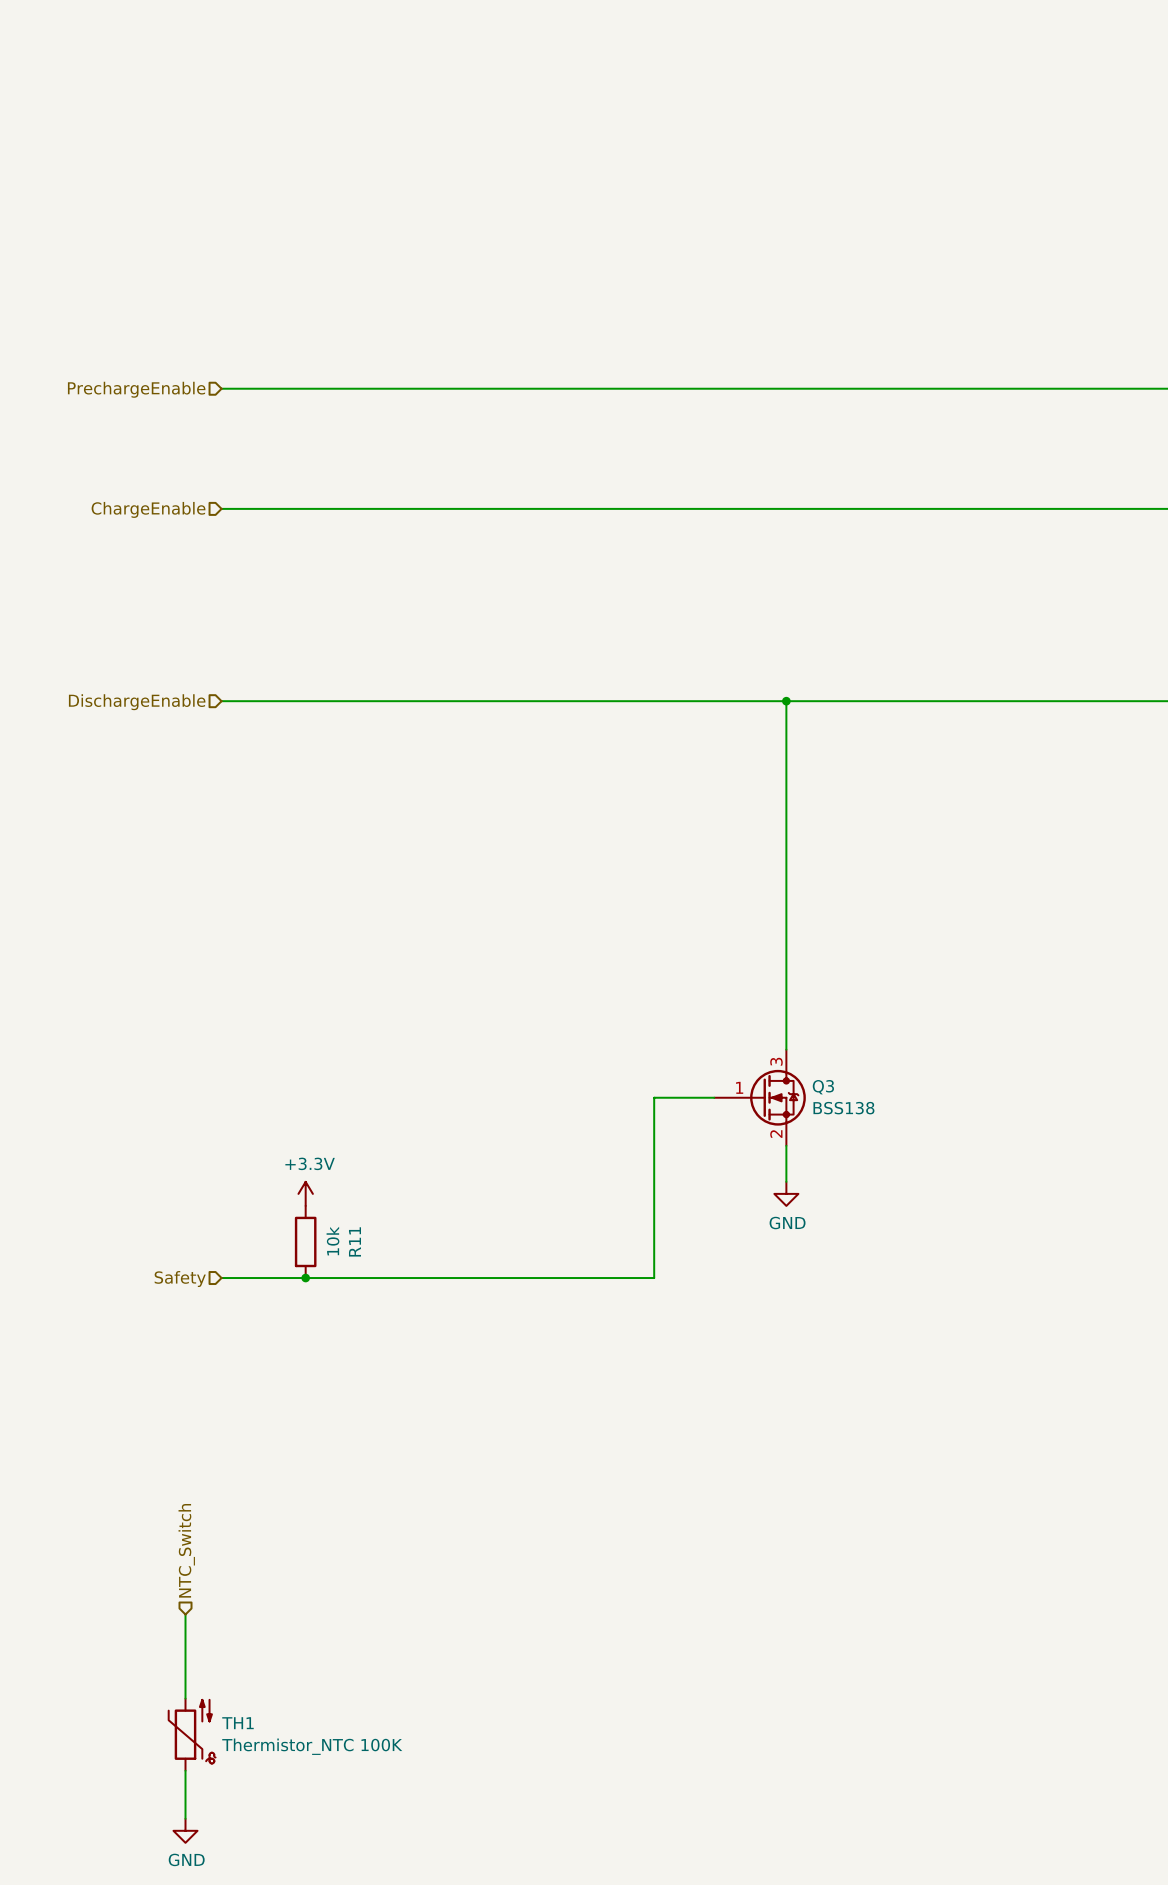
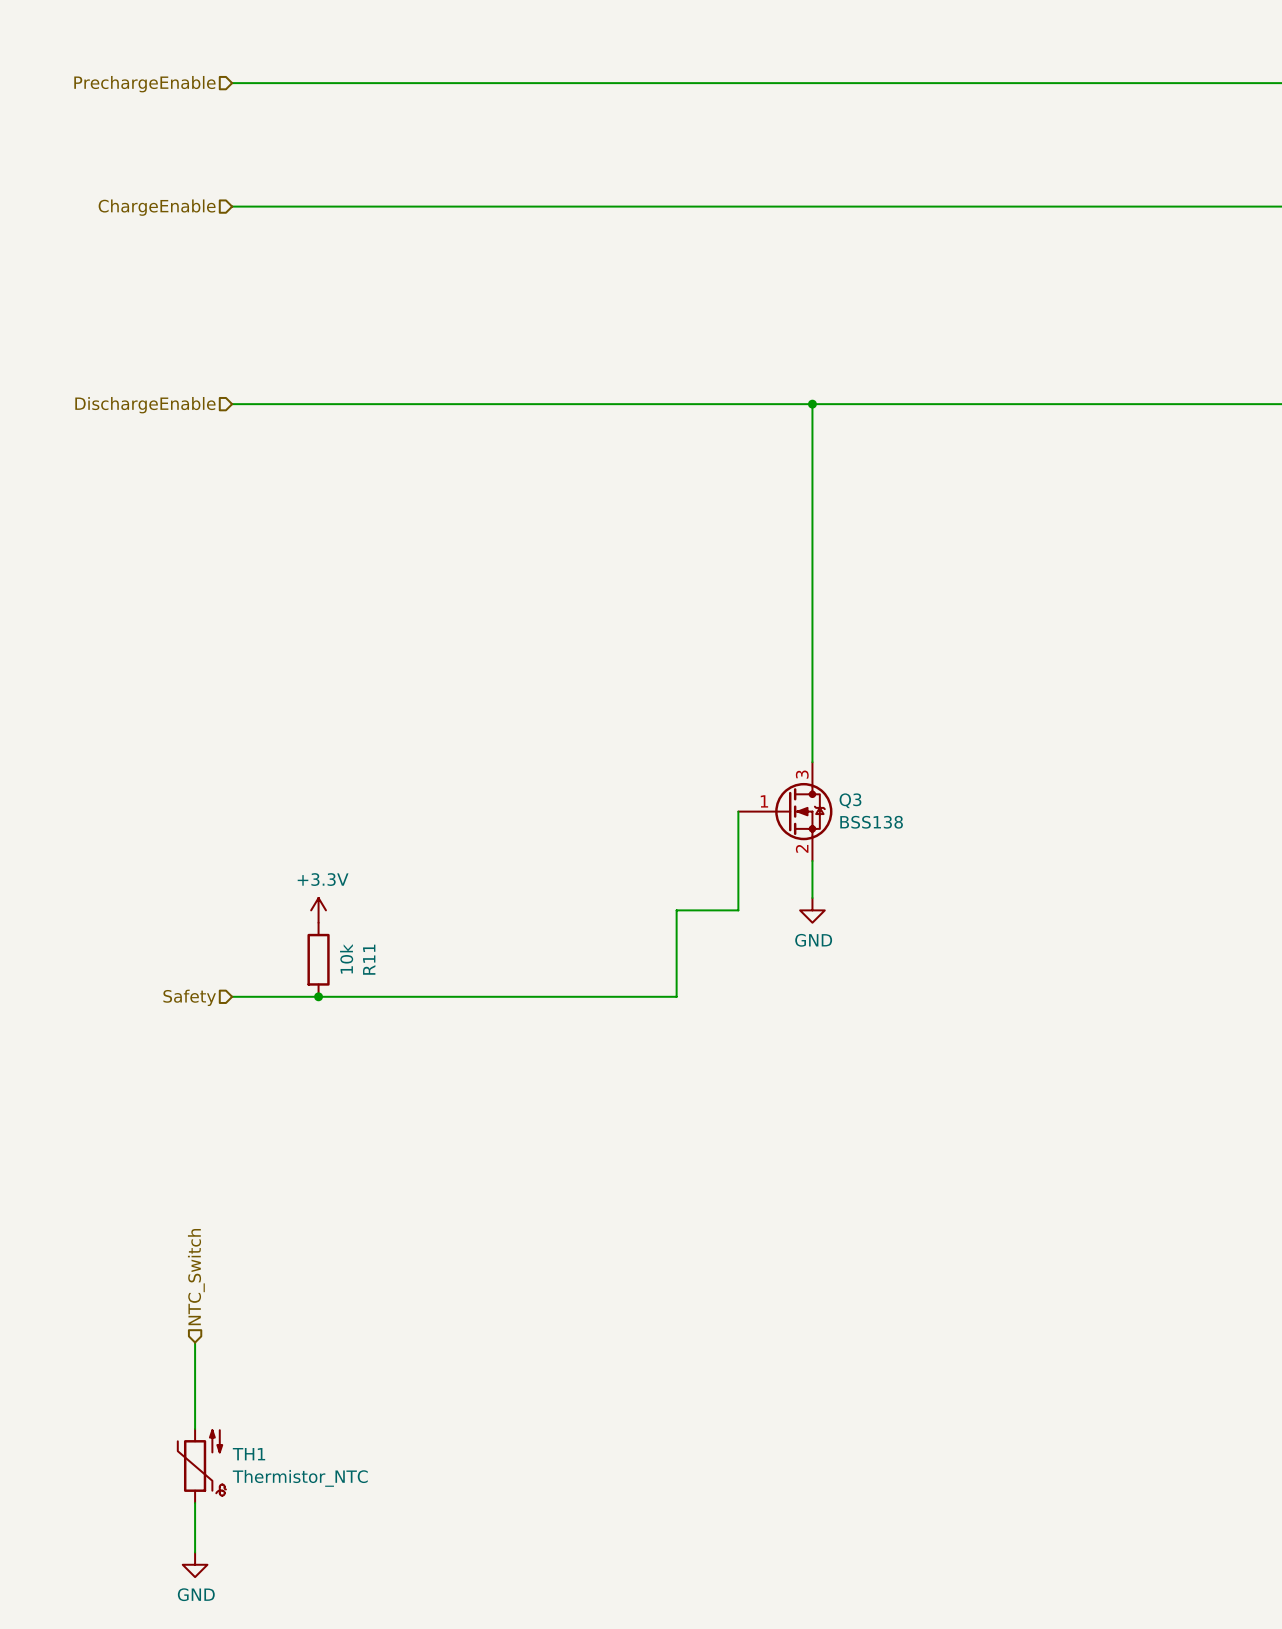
wire: (714, 1097) (654, 1097) (654, 1193) -> (738, 811) (738, 910) (676, 910)
TH1 value: Thermistor_NTC 100K (312, 1746) -> Thermistor_NTC (300, 1478)

